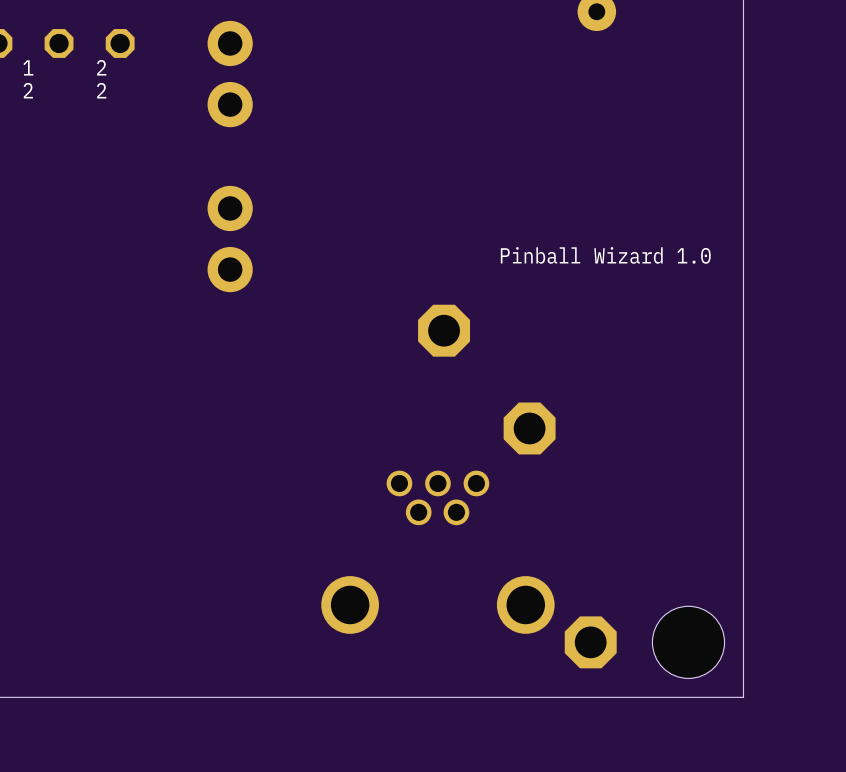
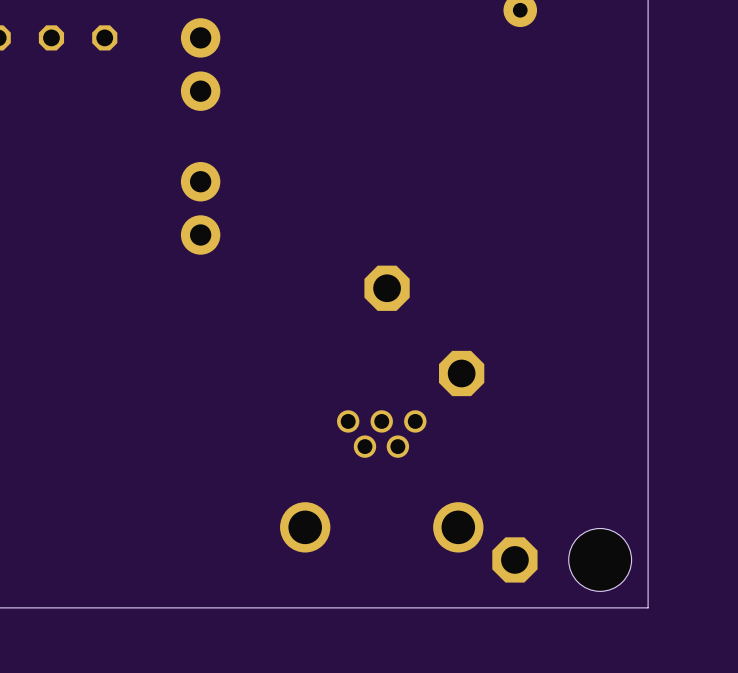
text: 1 (28, 67) -> none
text: 2 (101, 67) -> none
text: 2 (28, 90) -> none
text: 2 (101, 90) -> none
text: Pinball Wizard 1.0 (605, 255) -> none

